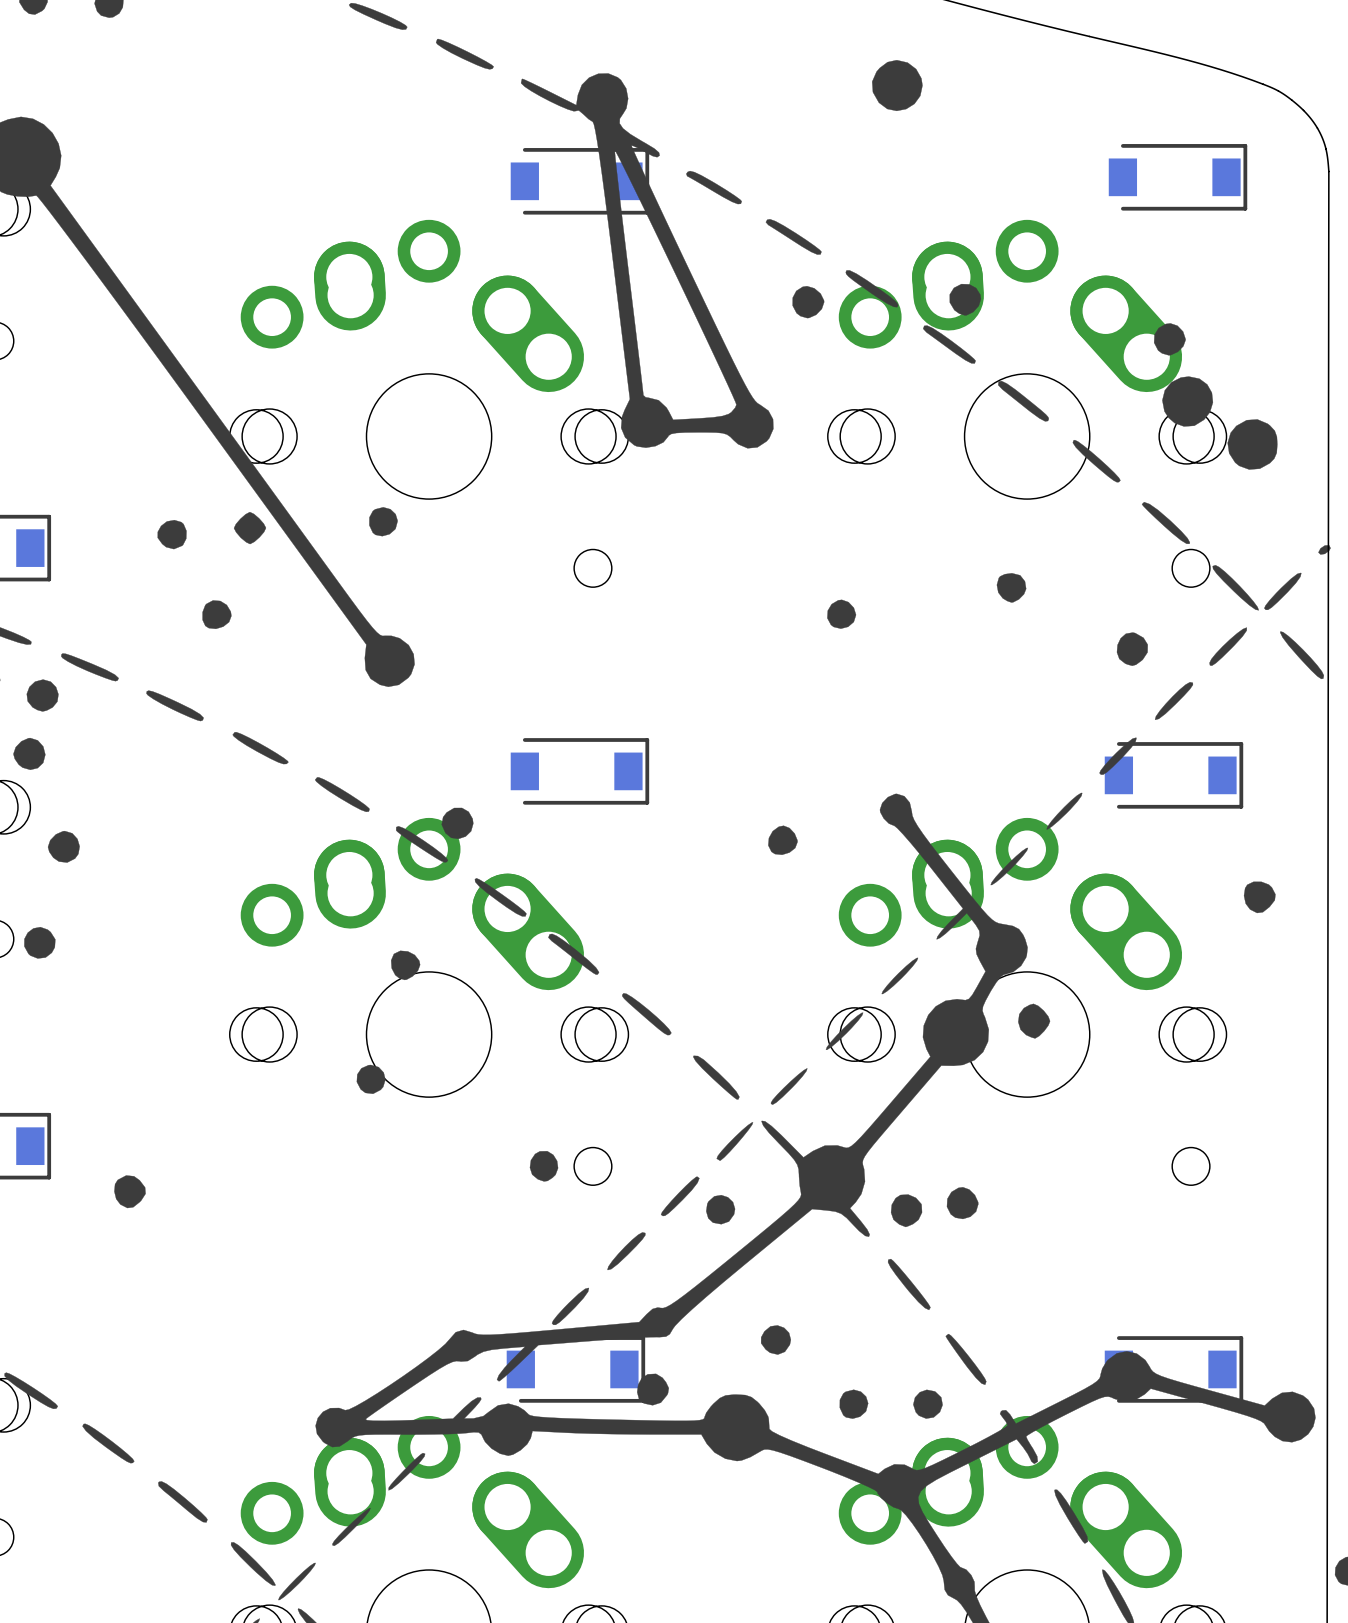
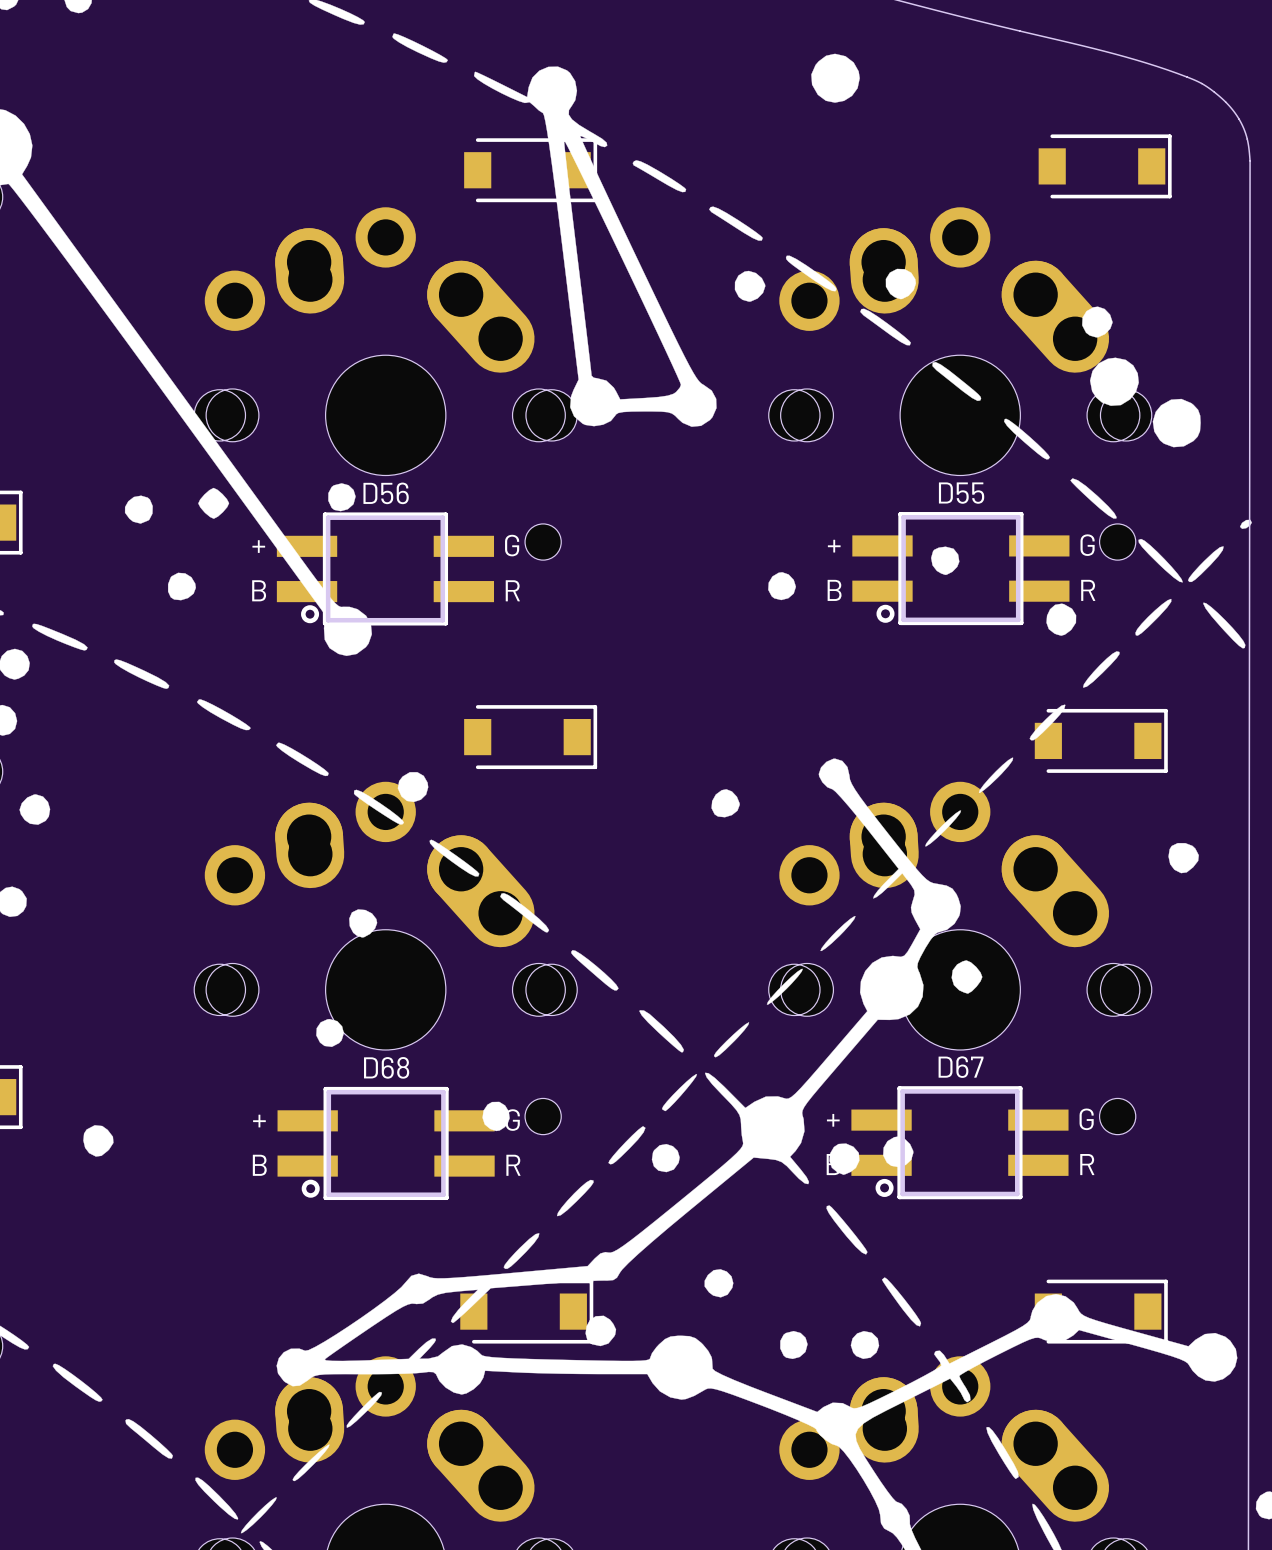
D55: none -> (960, 568)
D56: none -> (385, 568)
D67: none -> (959, 1142)
D68: none -> (386, 1143)

